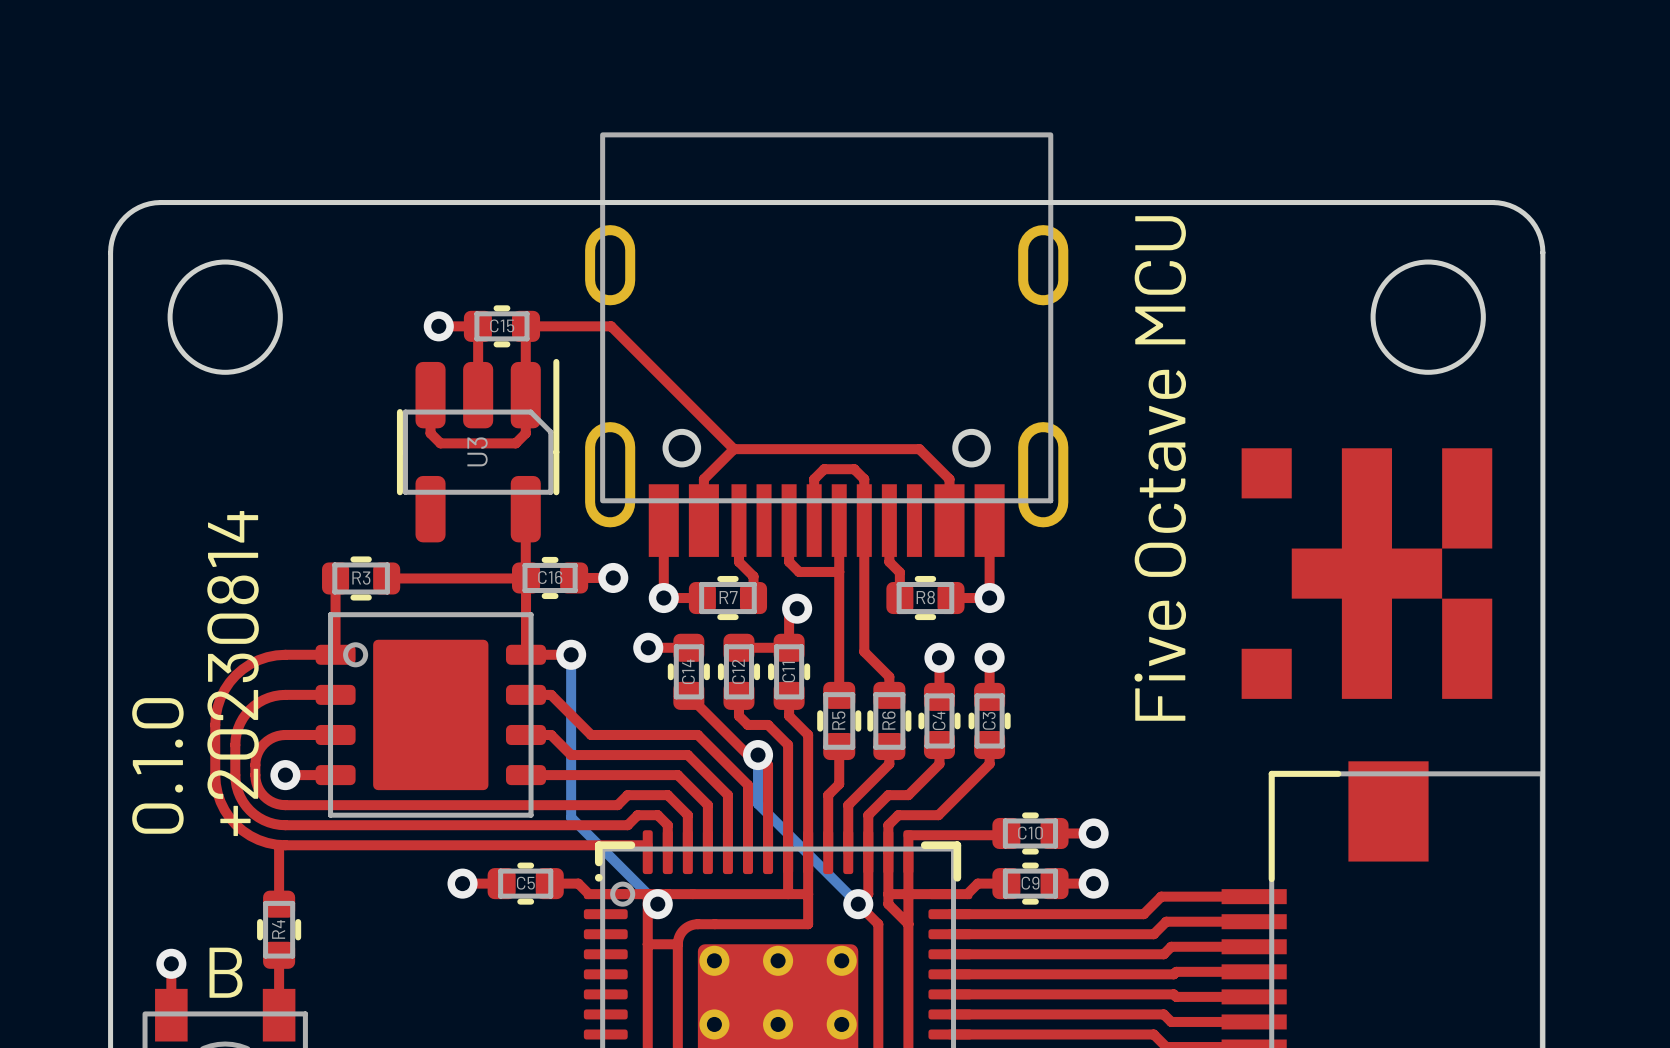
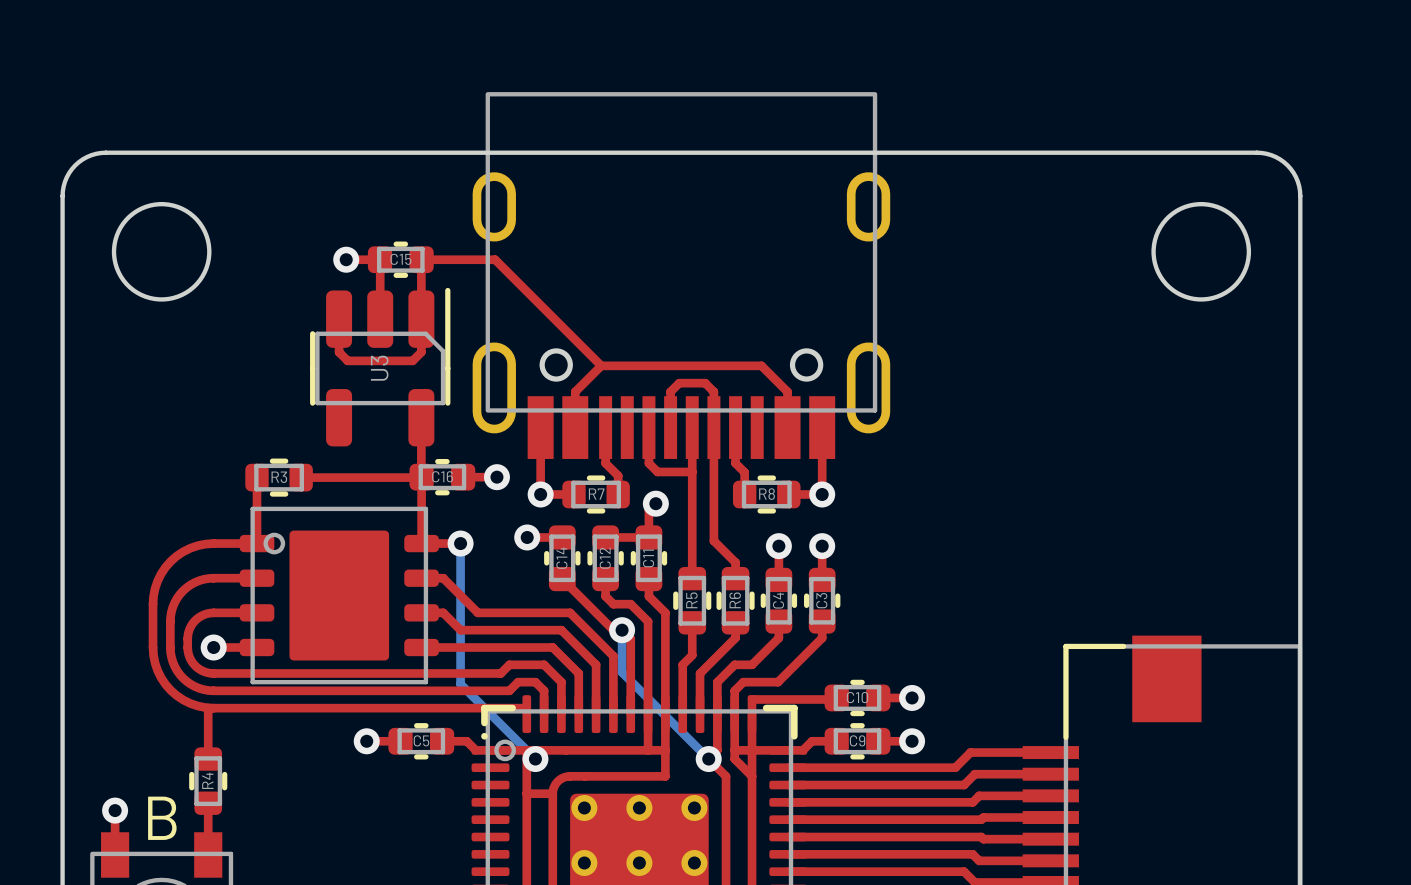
drawing: [1241, 448, 1493, 699] -> none
text: Five Octave MCU (1160, 468) -> none
text: +20230814 (233, 673) -> none
text: 0.1.0 (157, 765) -> none

